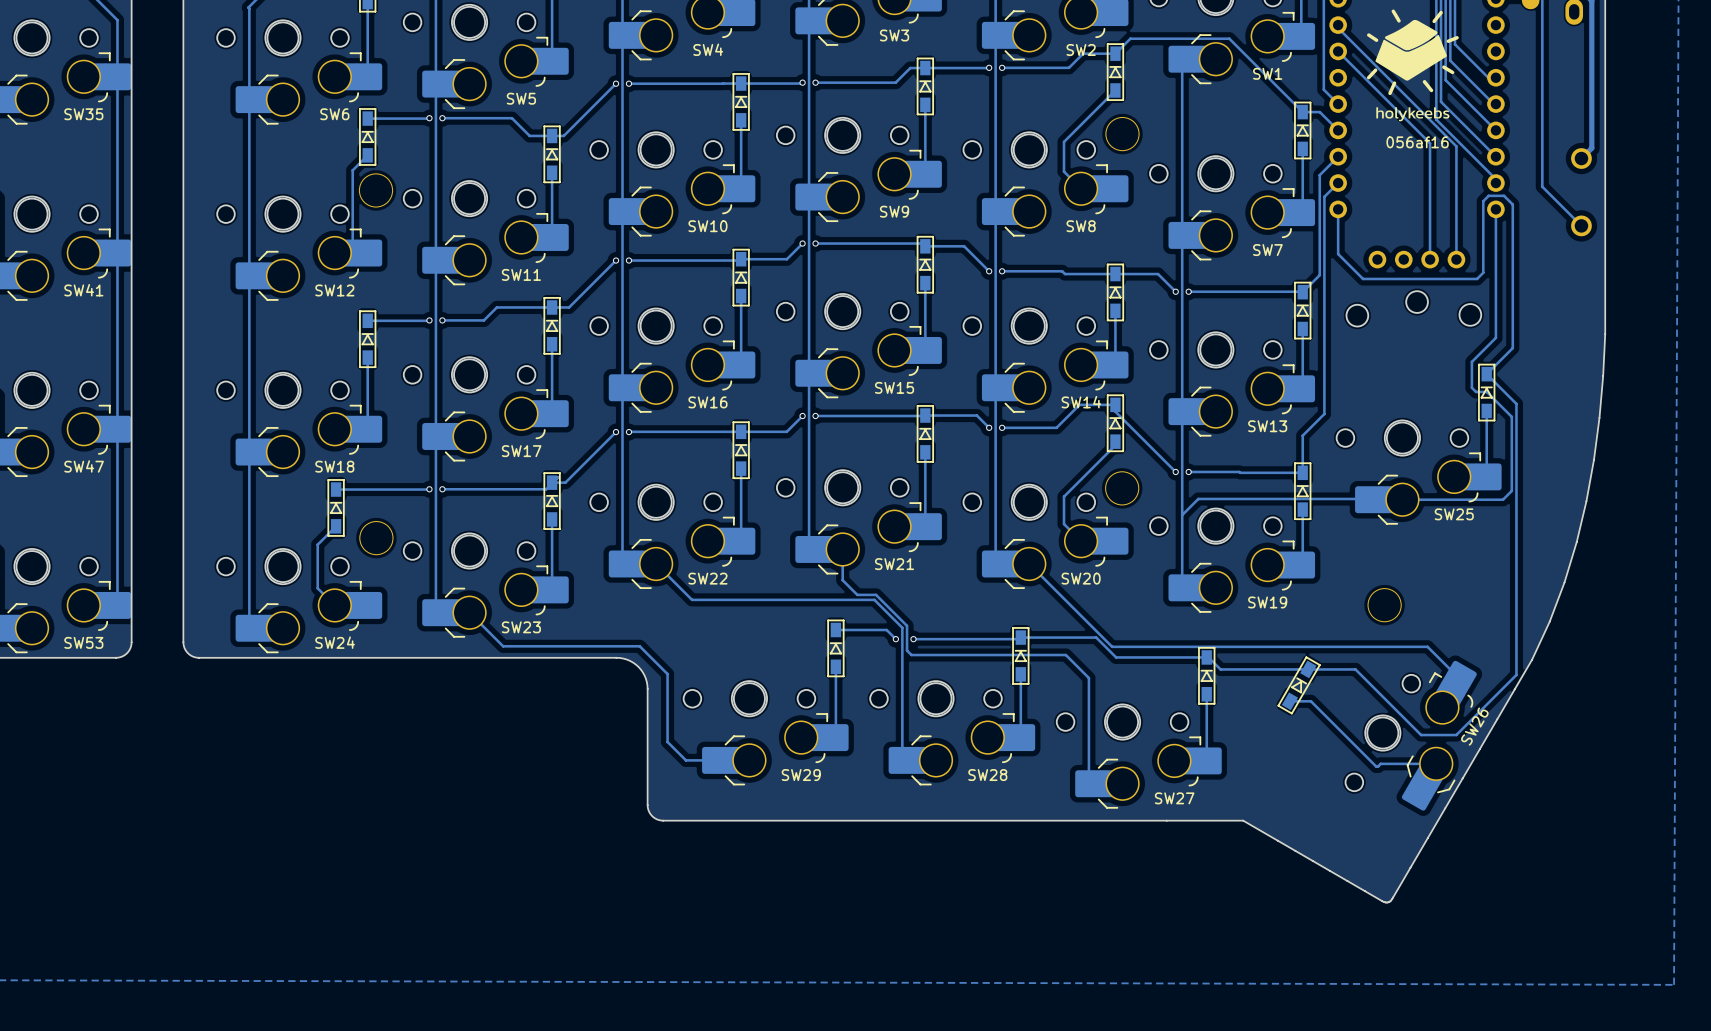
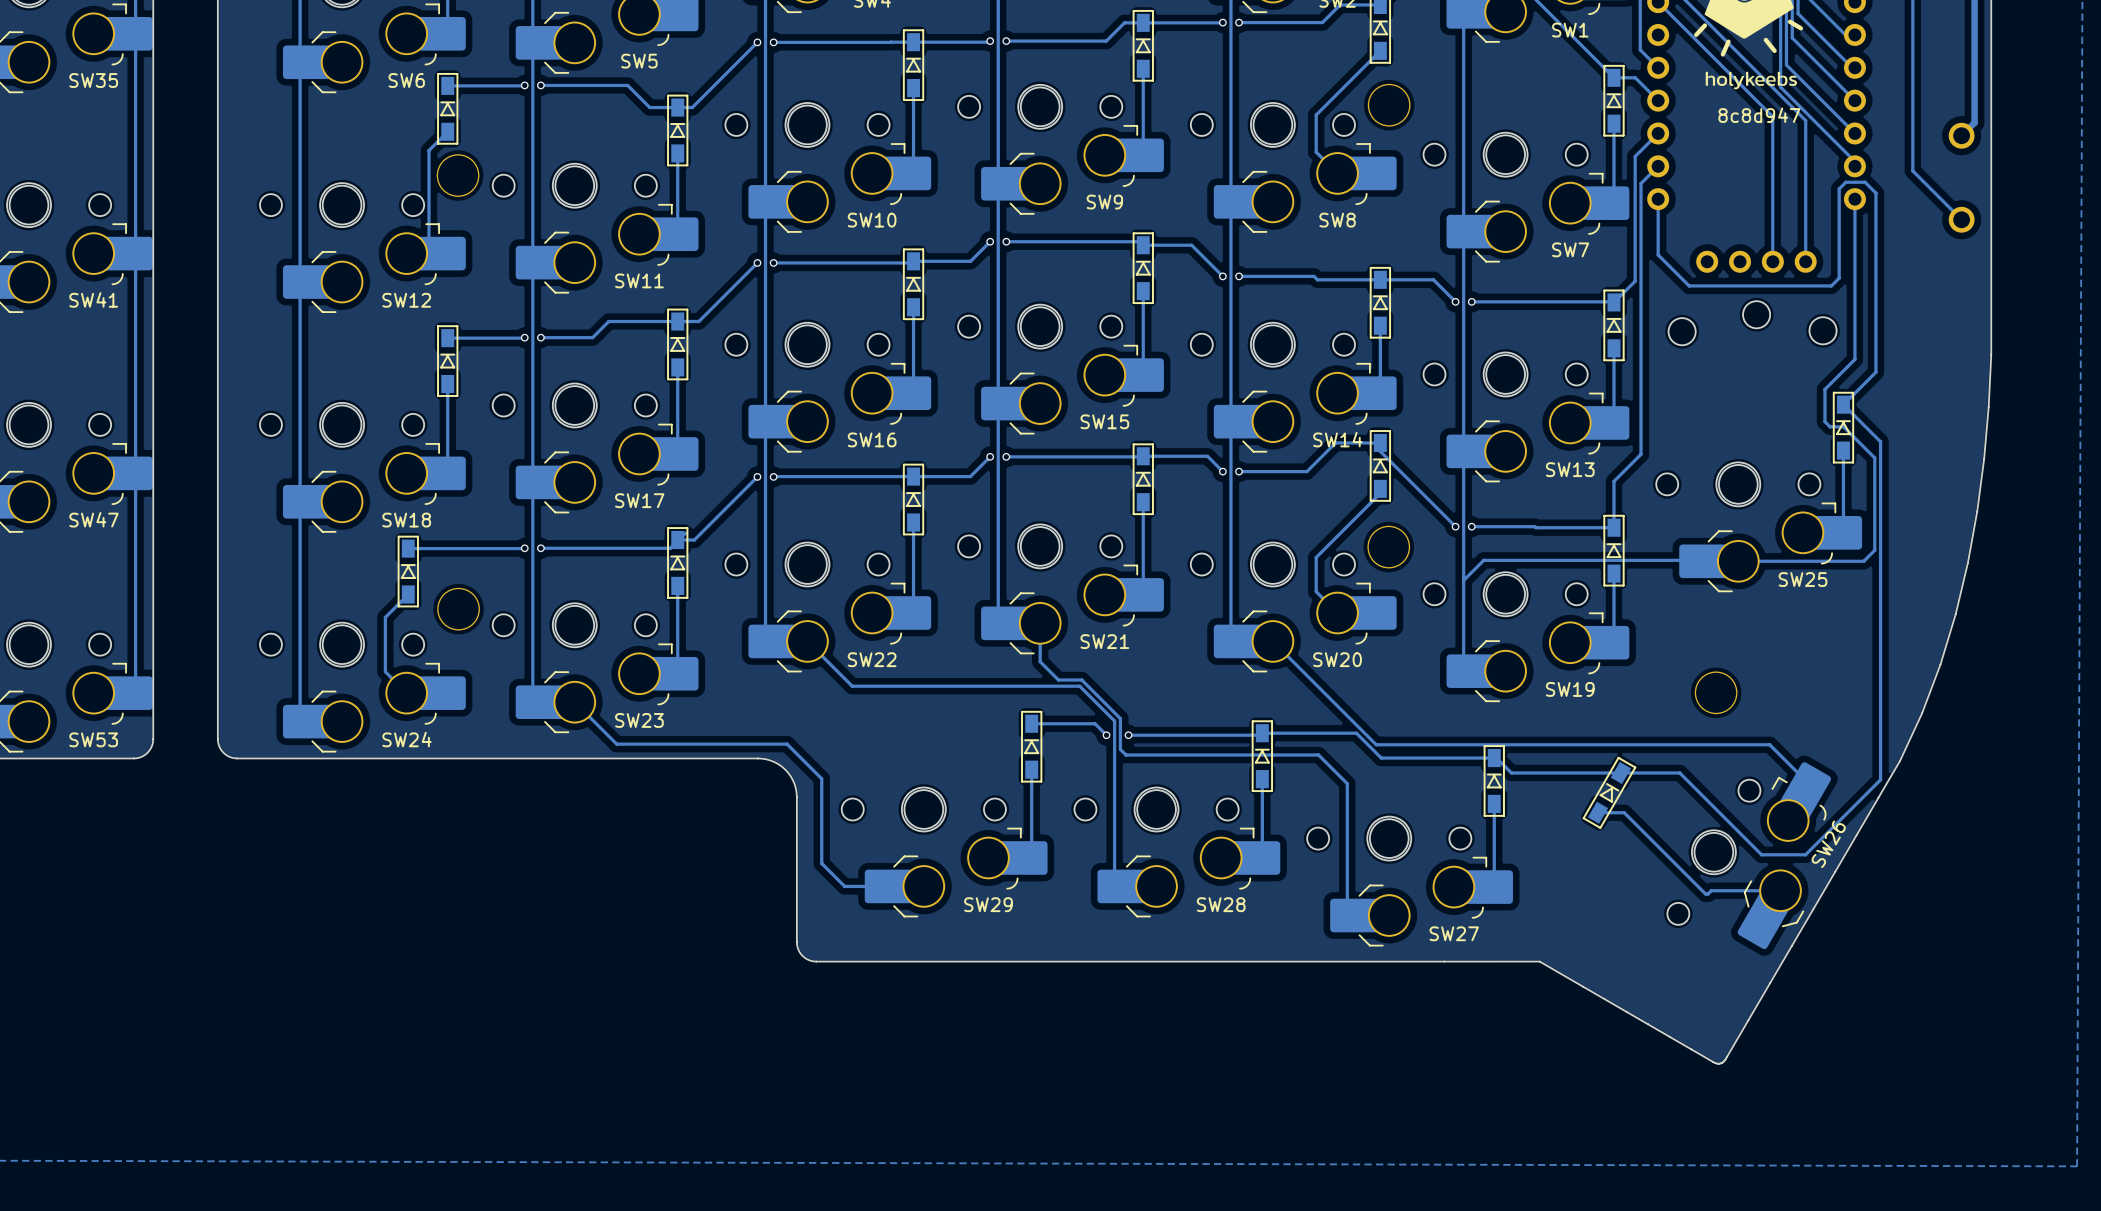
text: 056af16 (1417, 142) -> 8c8d947 (1759, 115)

